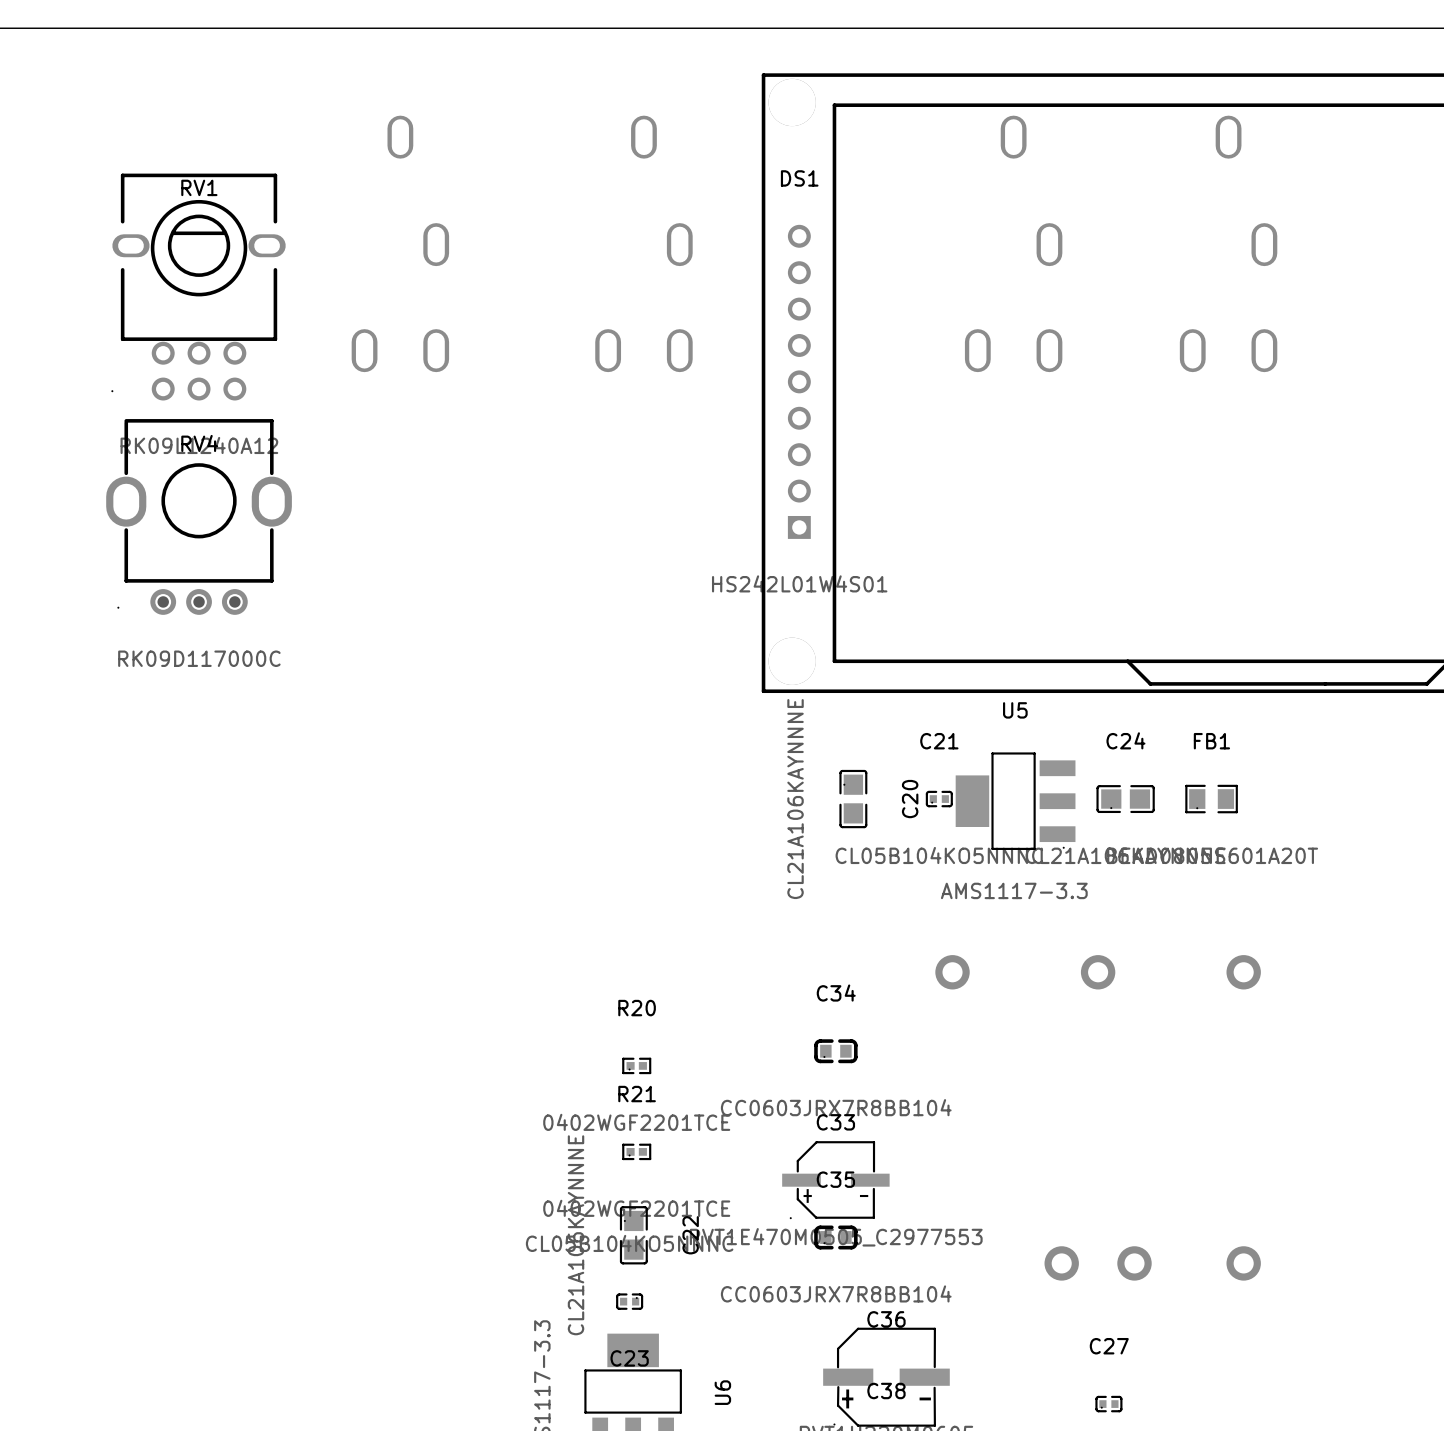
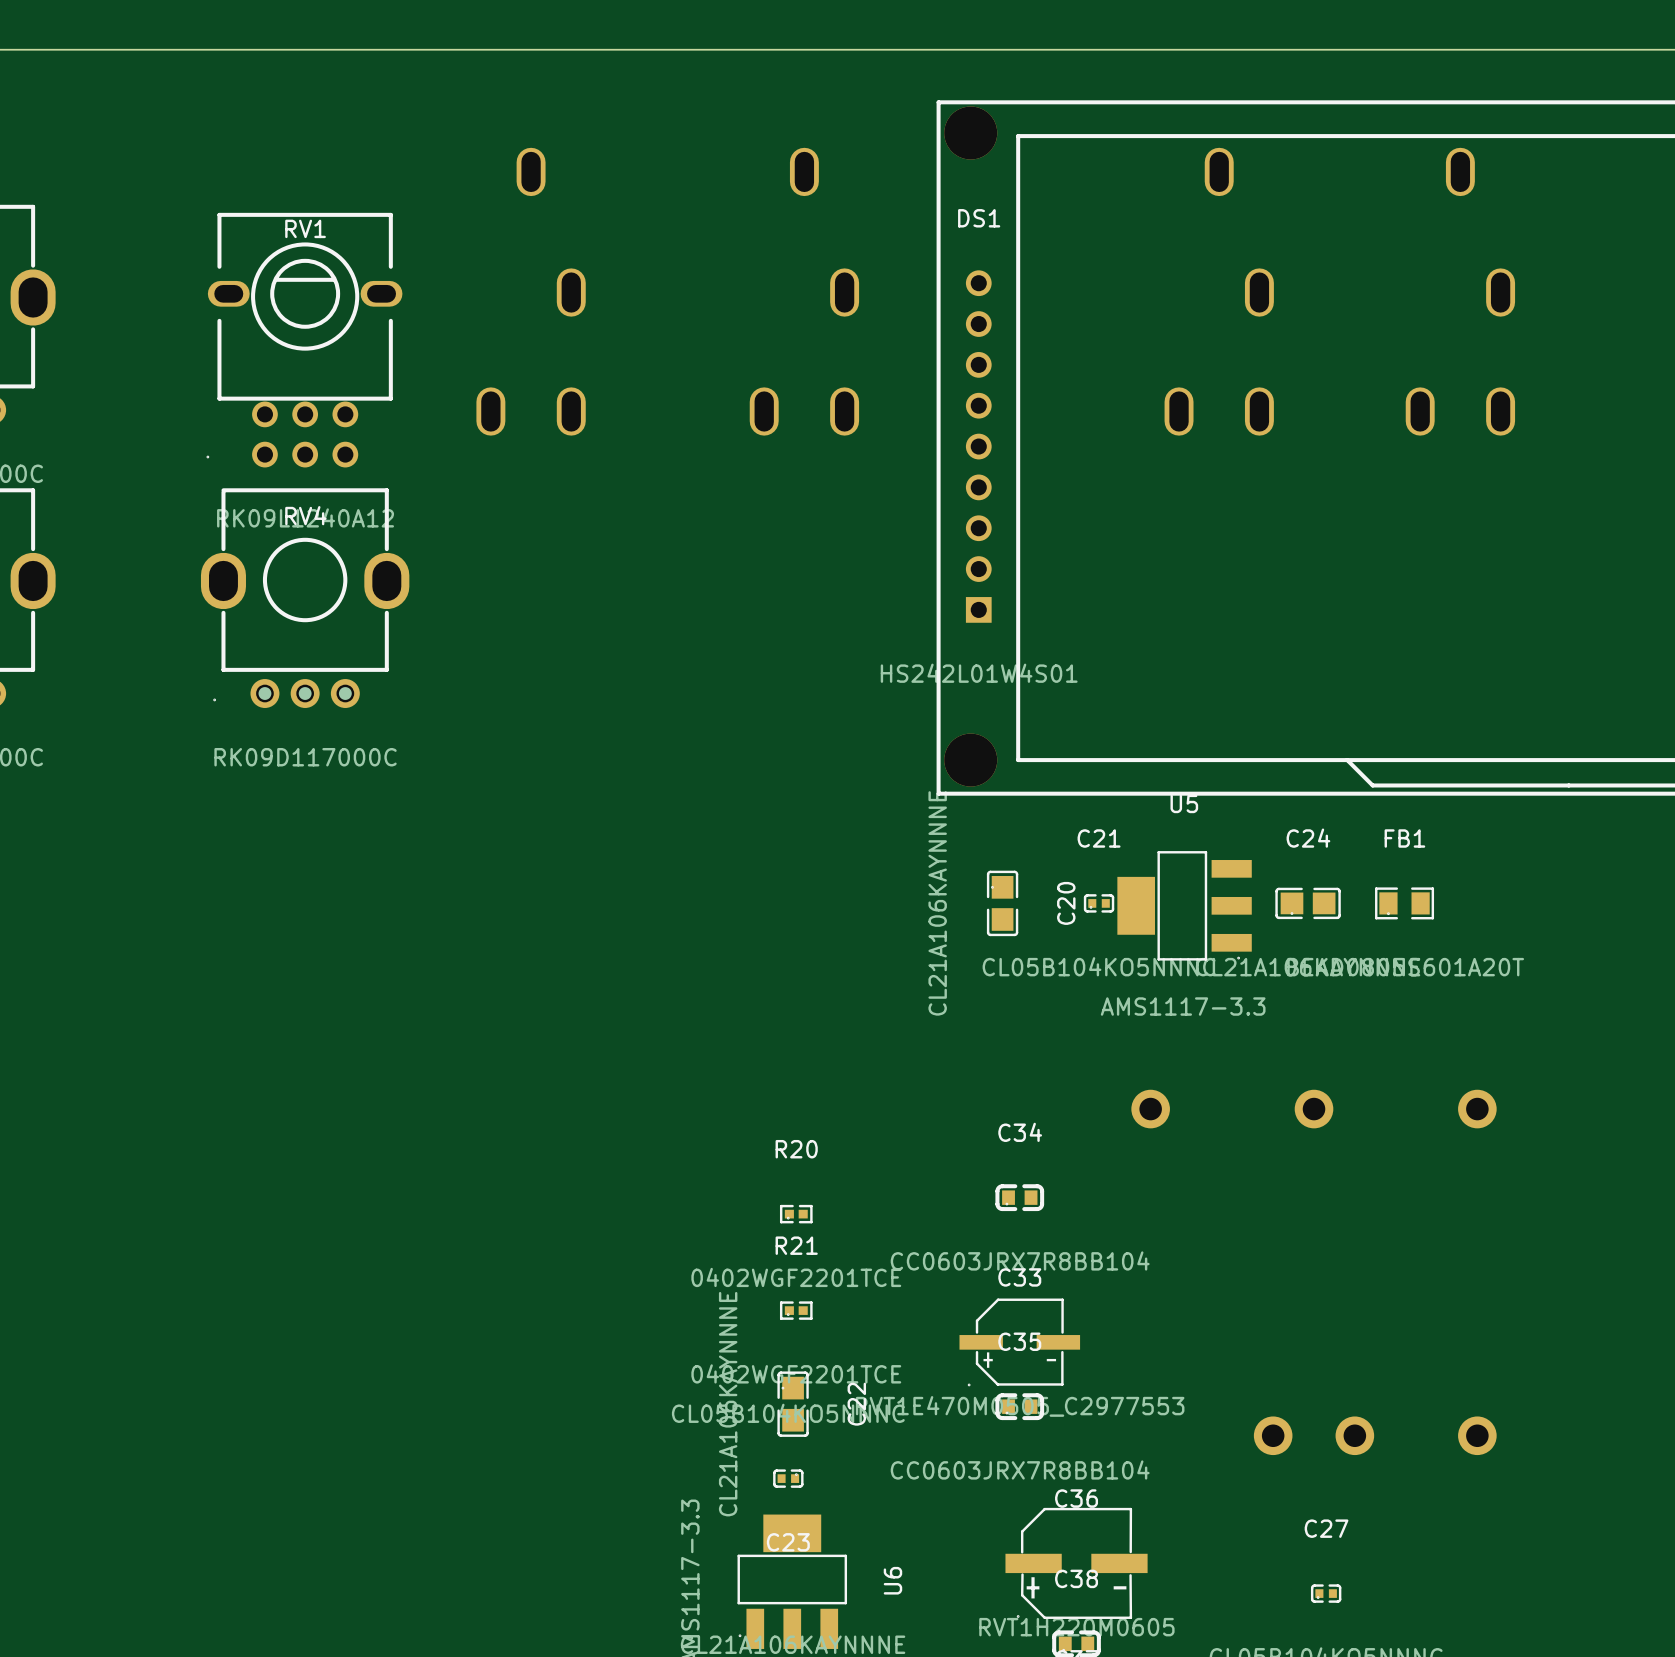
C20 position: (853, 799) -> (1002, 903)
C21 position: (939, 799) -> (1099, 903)
C24 position: (1125, 799) -> (1308, 903)
FB1 position: (1211, 799) -> (1404, 903)
U5 position: (1015, 801) -> (1184, 905)

